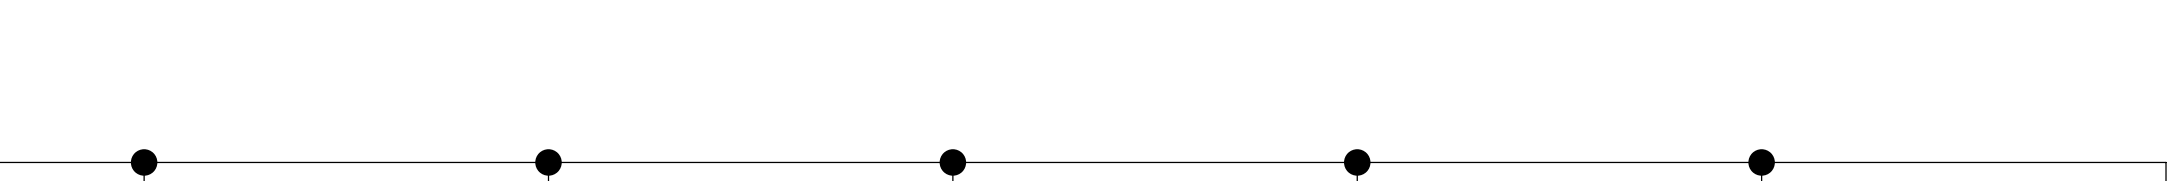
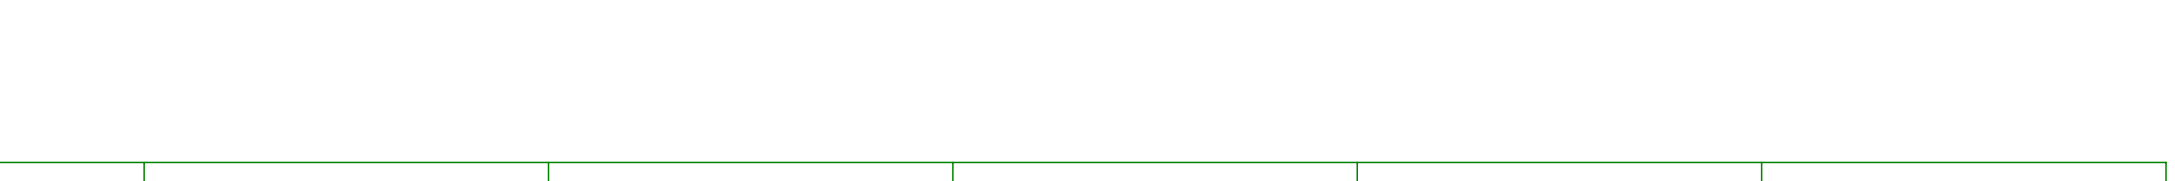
junction: (144, 162) -> none
junction: (548, 162) -> none
junction: (952, 162) -> none
junction: (1357, 162) -> none
junction: (1761, 162) -> none

